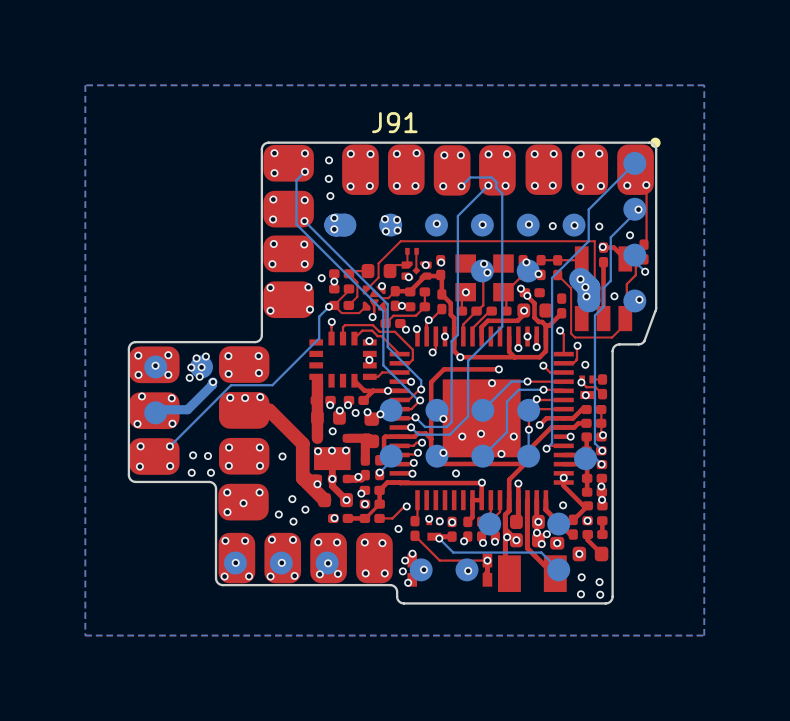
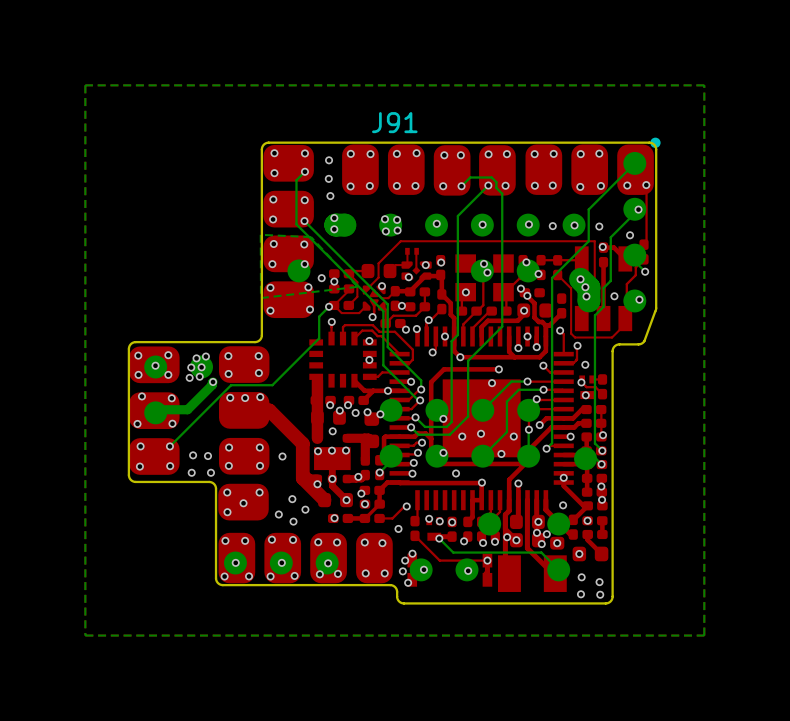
J91 footprint: [144, 137, 661, 582] -> [144, 137, 661, 582]
bottom zone outline: none -> (260, 234) (311, 237) (357, 286) (260, 298) (260, 234)

